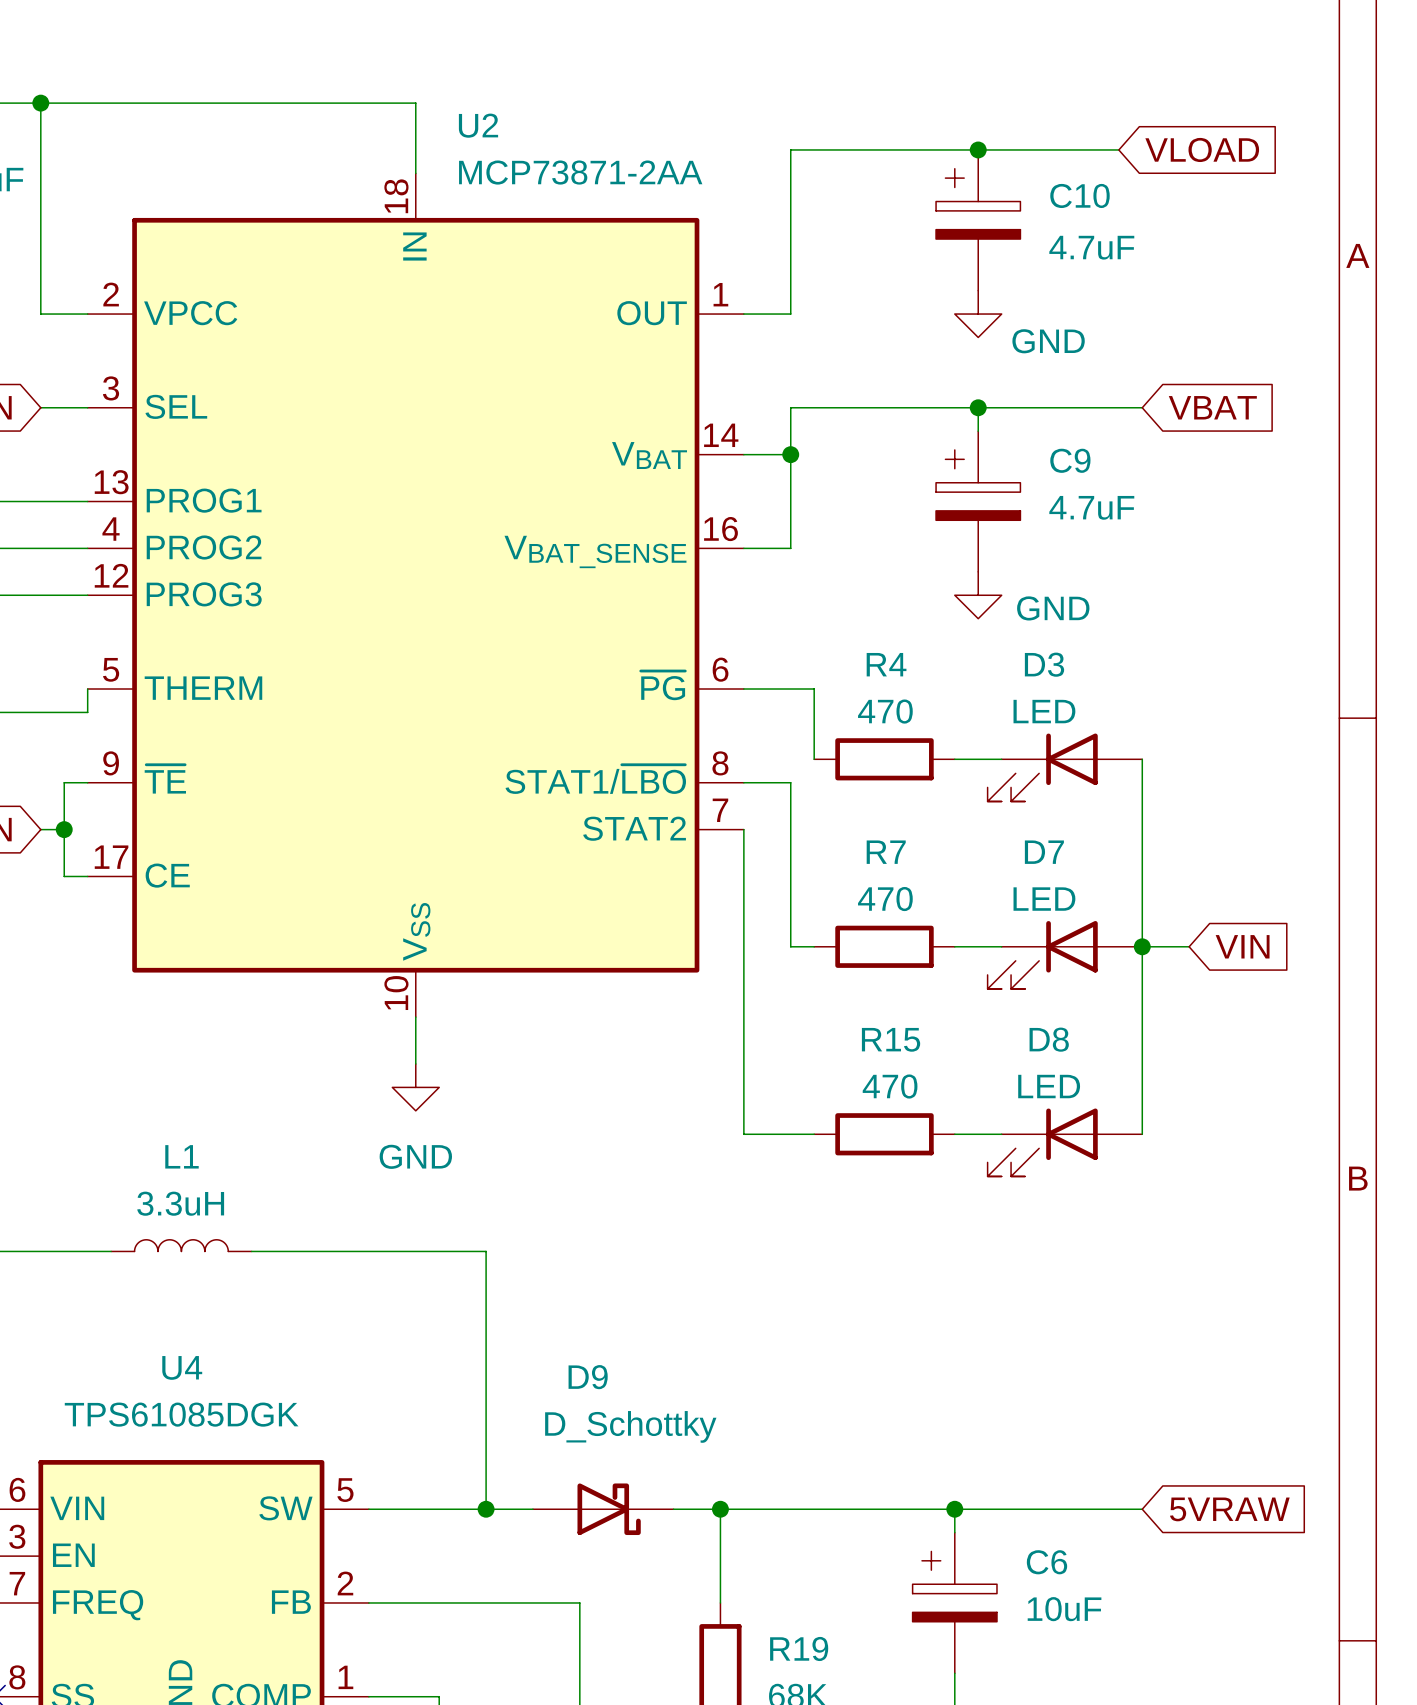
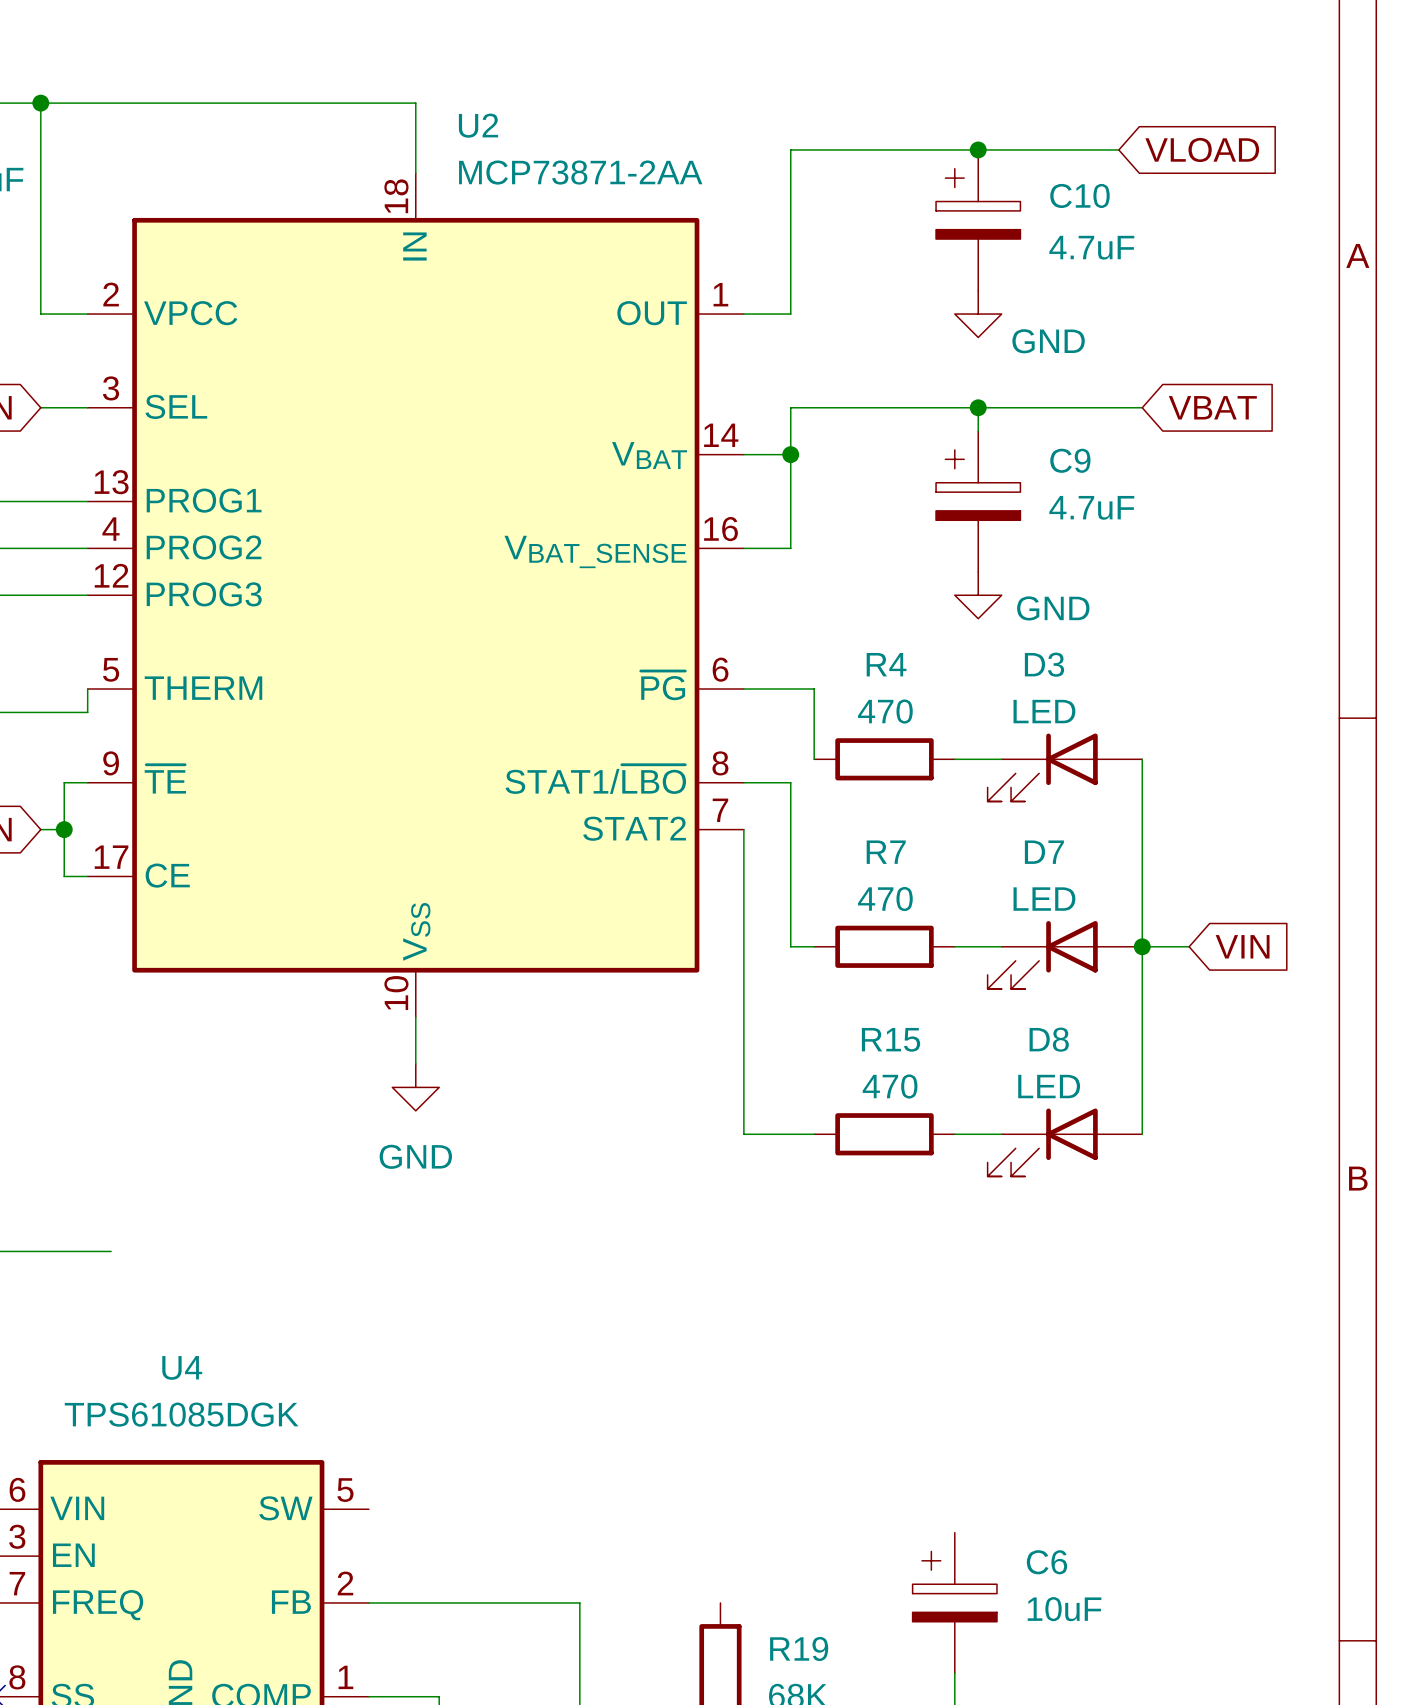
L1: 3.3uH (181, 1245) -> none
wire: (251, 1251) (486, 1251) (486, 1509) -> none
wire: (368, 1509) (532, 1509) -> none
junction: (486, 1509) -> none
D9: D_Schottky (603, 1509) -> none
wire: (673, 1509) (1142, 1509) -> none
wire: (720, 1509) (720, 1602) -> none
junction: (720, 1509) -> none
wire: (954, 1509) (954, 1532) -> none
junction: (954, 1509) -> none
global label: 5VRAW (1229, 1509) -> none

